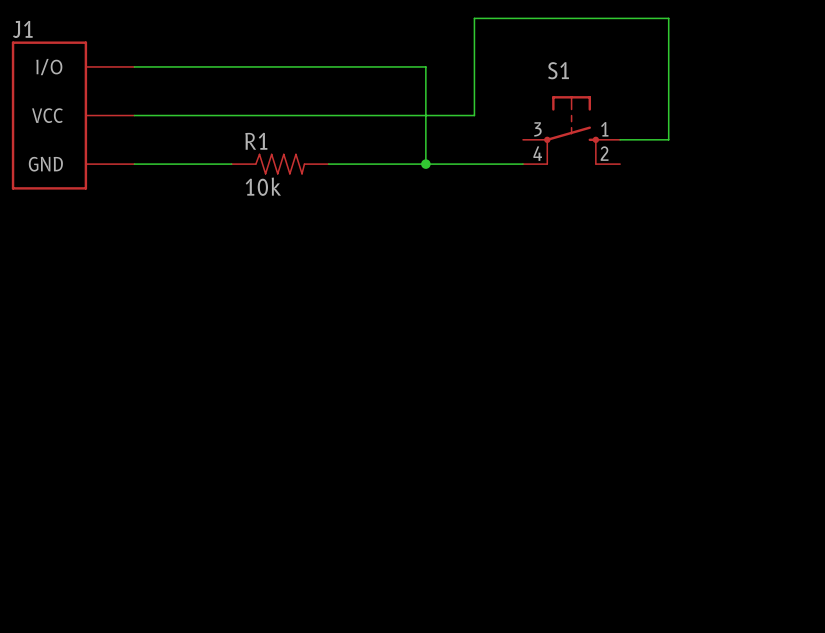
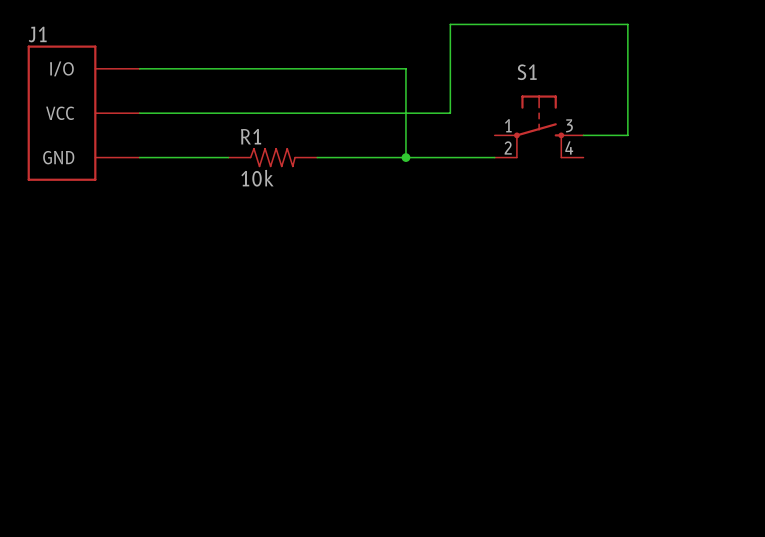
S1 pin number: 3 (537, 129) -> 1 (508, 125)
S1 pin number: 1 (604, 129) -> 3 (569, 125)
S1 pin number: 4 (537, 153) -> 2 (508, 147)
S1 pin number: 2 (604, 153) -> 4 (569, 147)

